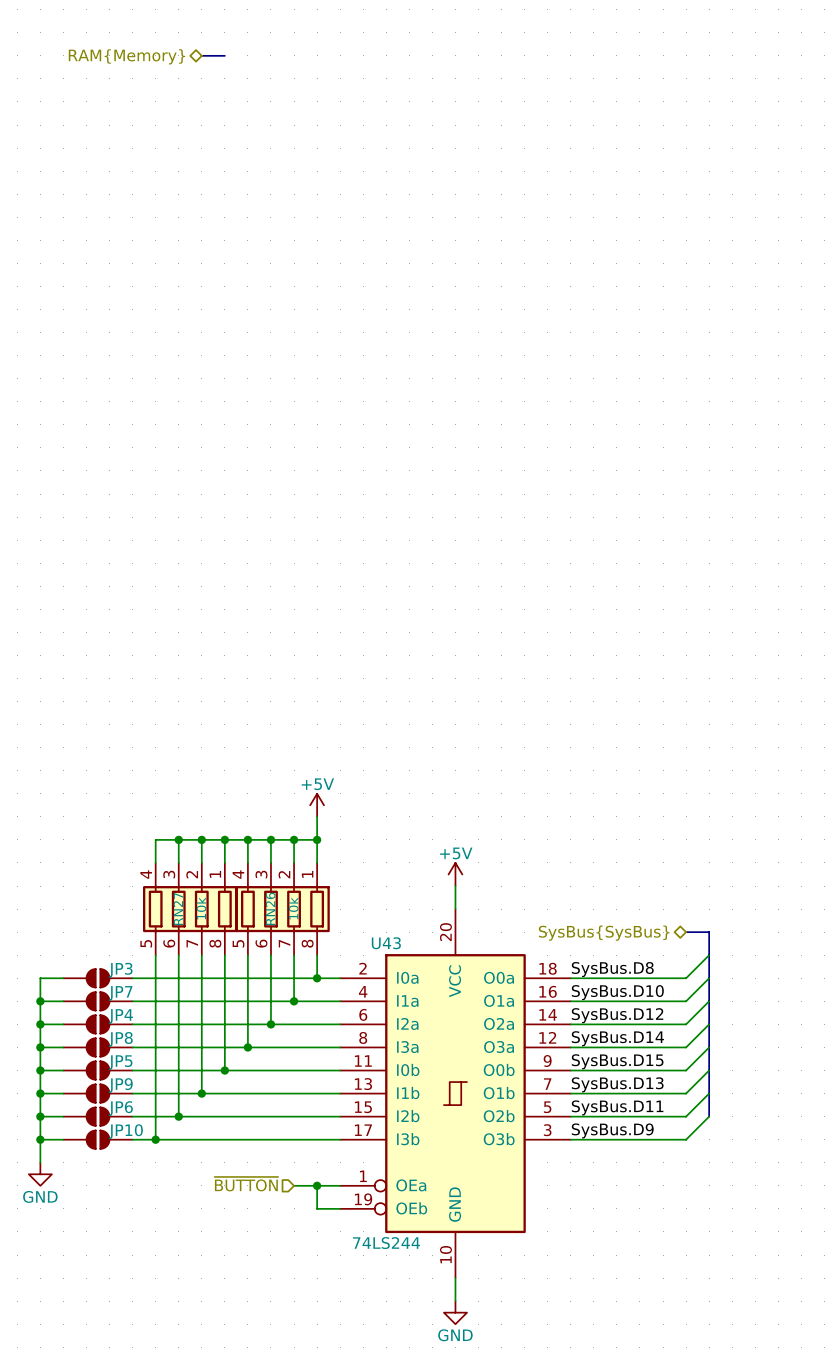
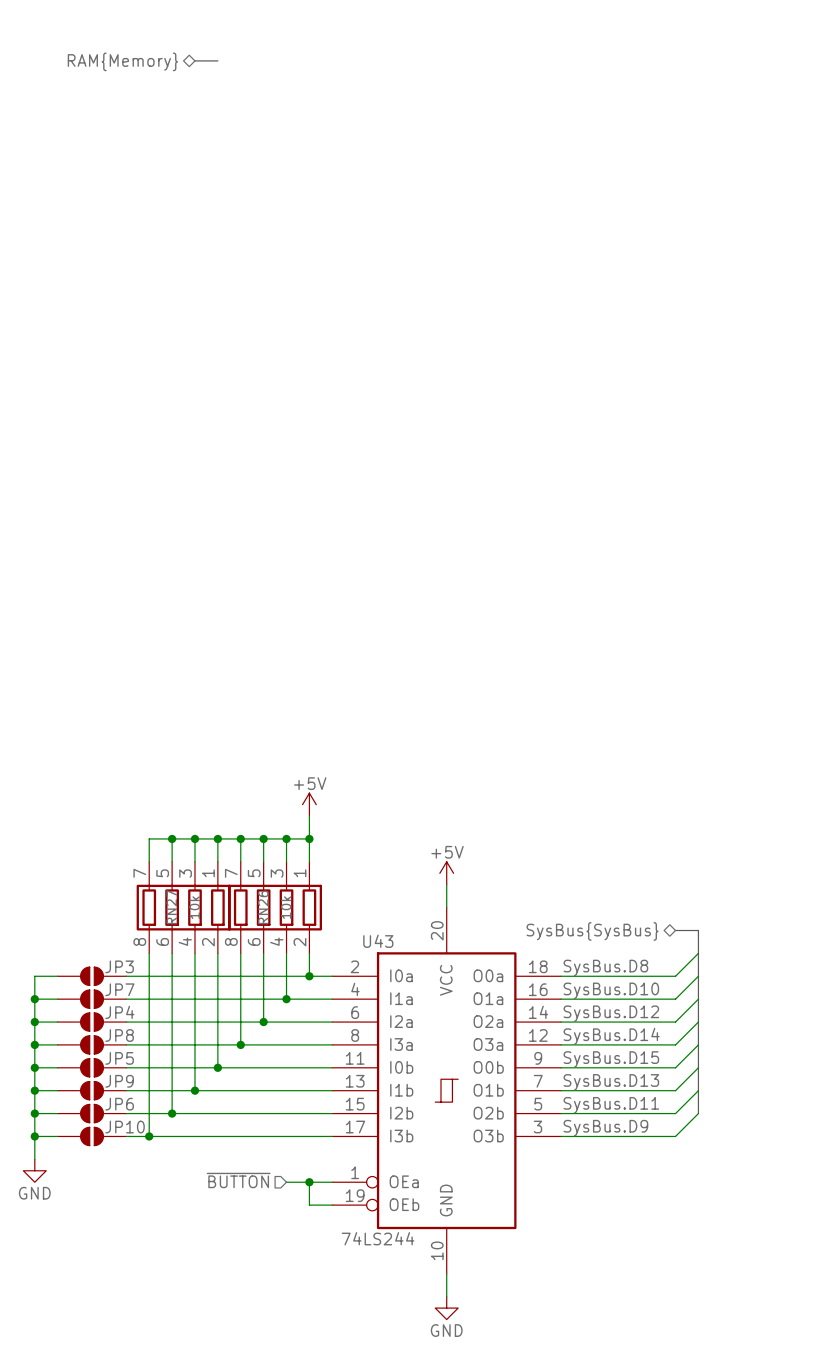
RN27 pin number: 4 (146, 874) -> 7 (139, 873)
RN27 pin number: 3 (169, 874) -> 5 (162, 873)
RN27 pin number: 2 (192, 874) -> 3 (185, 873)
RN26 pin number: 4 (238, 874) -> 7 (231, 873)
RN26 pin number: 3 (261, 874) -> 5 (254, 873)
RN26 pin number: 2 (284, 874) -> 3 (277, 873)
RN27 pin number: 5 (146, 943) -> 8 (139, 941)
RN27 pin number: 7 (192, 943) -> 4 (185, 941)
RN27 pin number: 8 (215, 943) -> 2 (208, 942)
RN26 pin number: 5 (238, 943) -> 8 (231, 941)
RN26 pin number: 7 (284, 943) -> 4 (276, 941)
RN26 pin number: 8 (307, 943) -> 2 (299, 942)

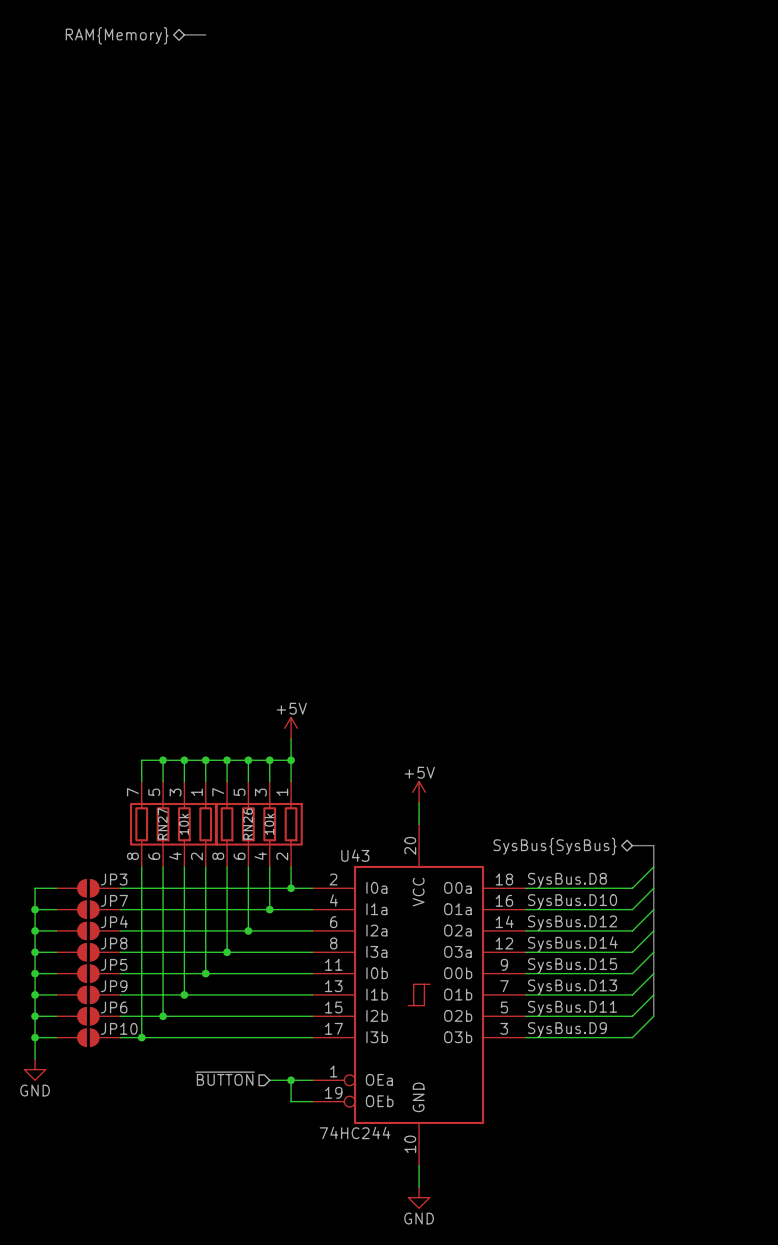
U43 value: 74LS244 (378, 1238) -> 74HC244 (355, 1132)

